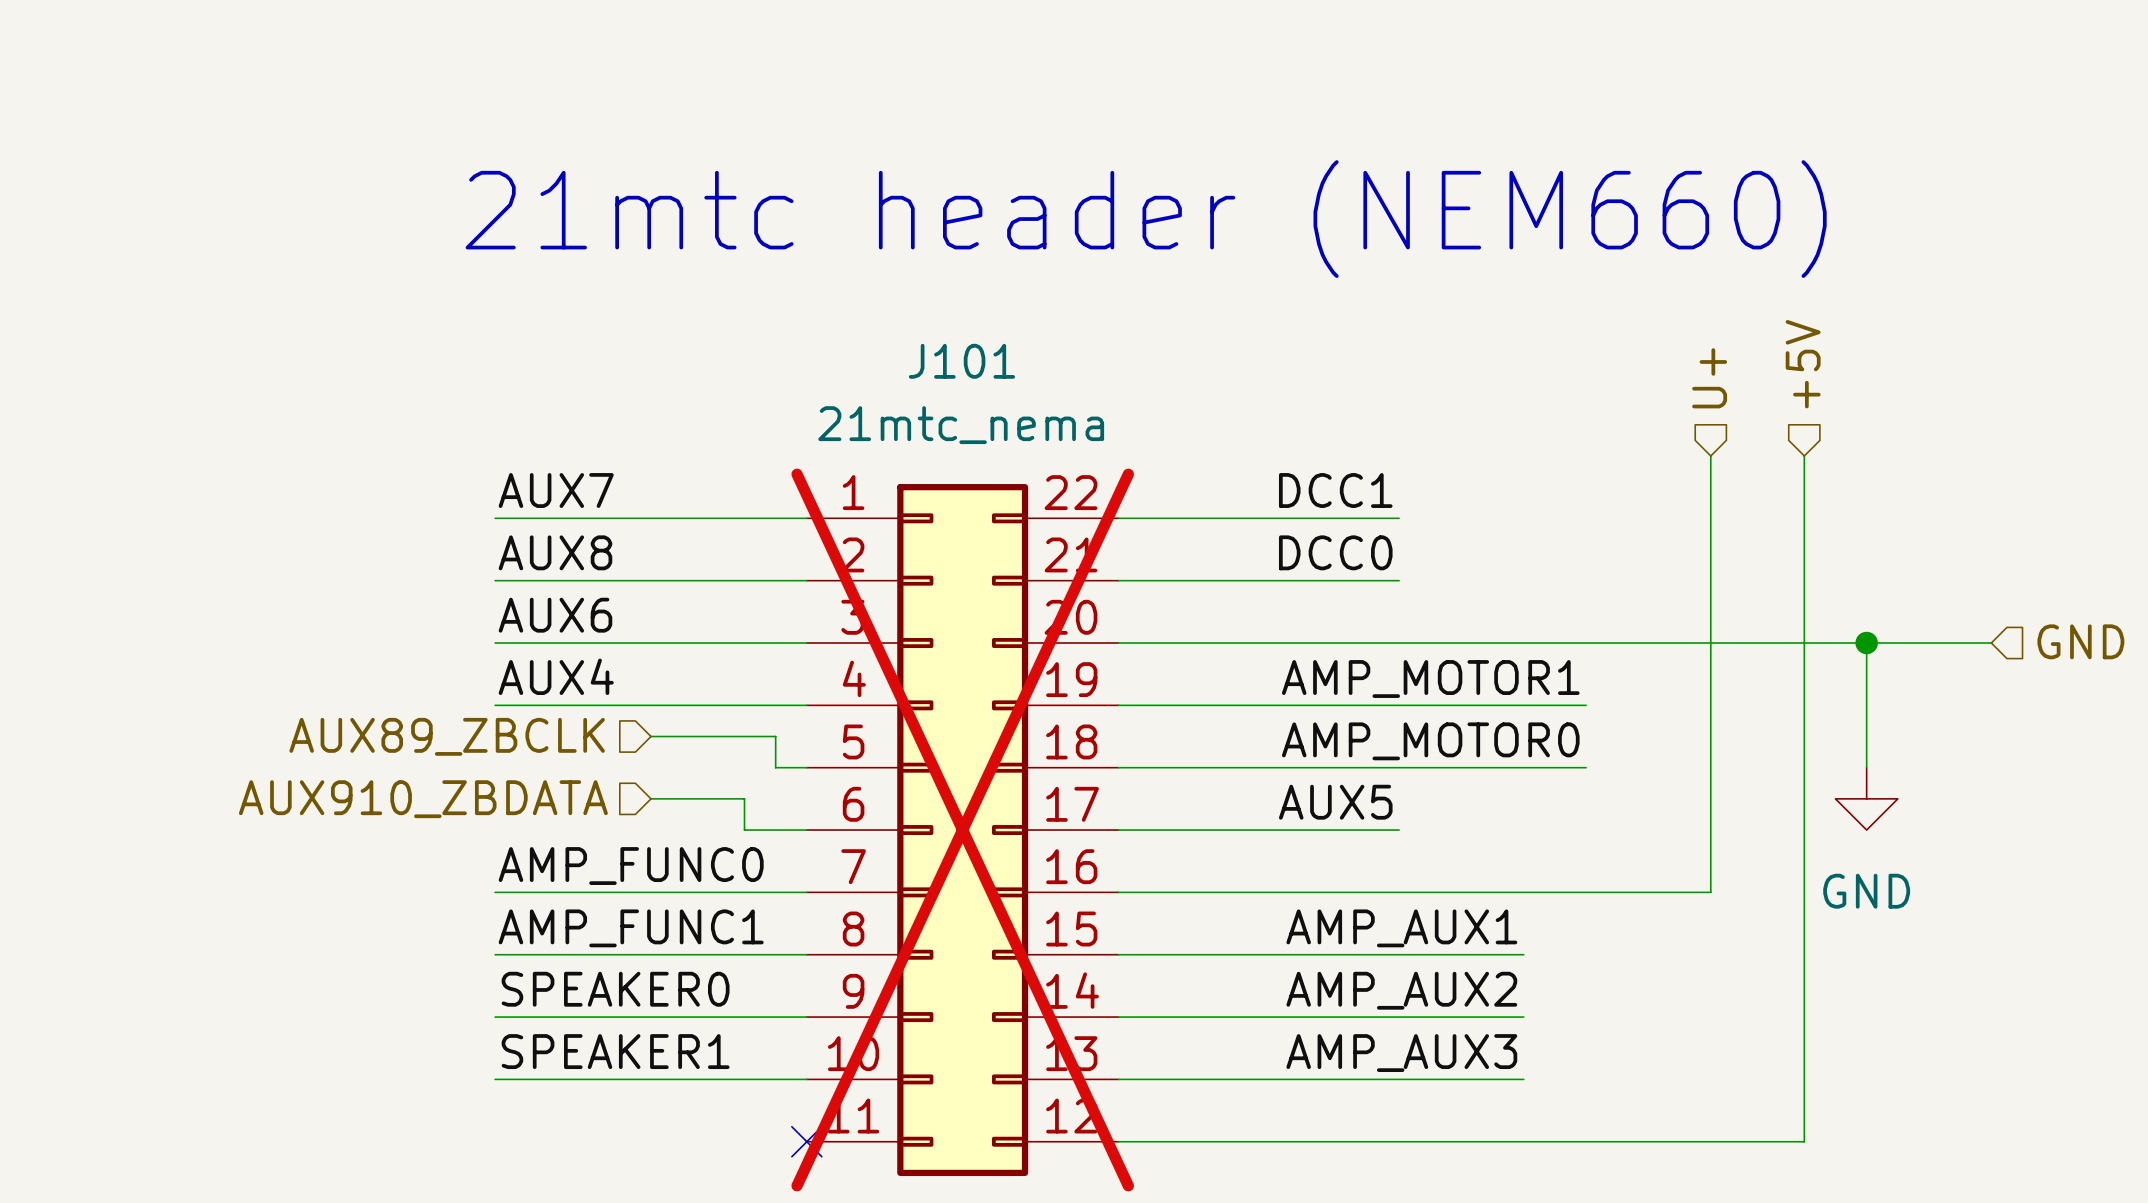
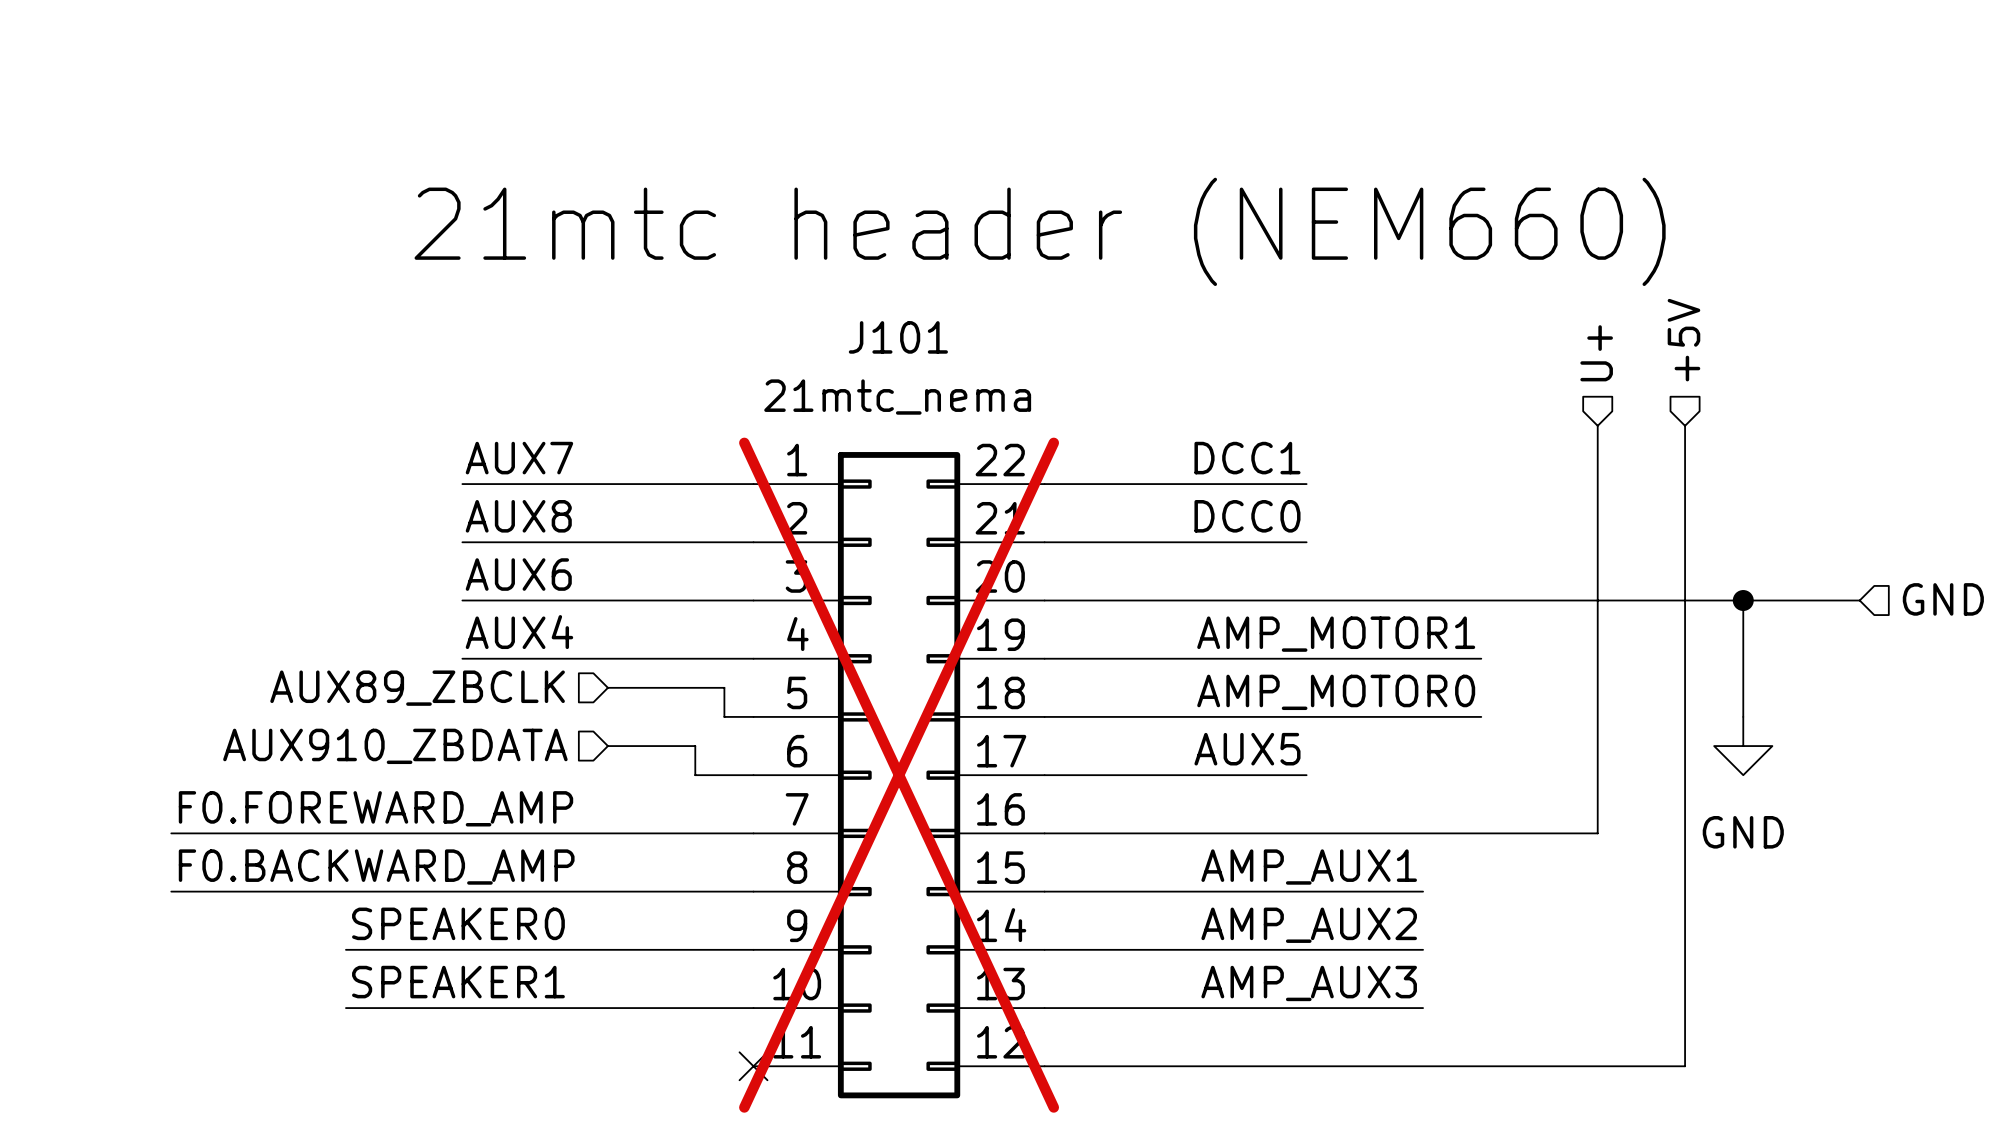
text: 21mtc header (NEM660) (1146, 219) -> none
label: none -> 21mtc header (NEM660) (1040, 231)
label: none -> F0.FOREWARD_AMP (375, 808)
label: AMP_FUNC0 (631, 866) -> none
wire: none -> (171, 833) (462, 833)
label: none -> F0.BACKWARD_AMP (376, 867)
label: AMP_FUNC1 (631, 928) -> none
wire: none -> (171, 891) (462, 891)
label position: SPEAKER0 (615, 989) -> SPEAKER0 (458, 923)
wire: none -> (345, 949) (462, 949)
label position: SPEAKER1 (615, 1051) -> SPEAKER1 (458, 982)
wire: none -> (345, 1008) (462, 1008)

